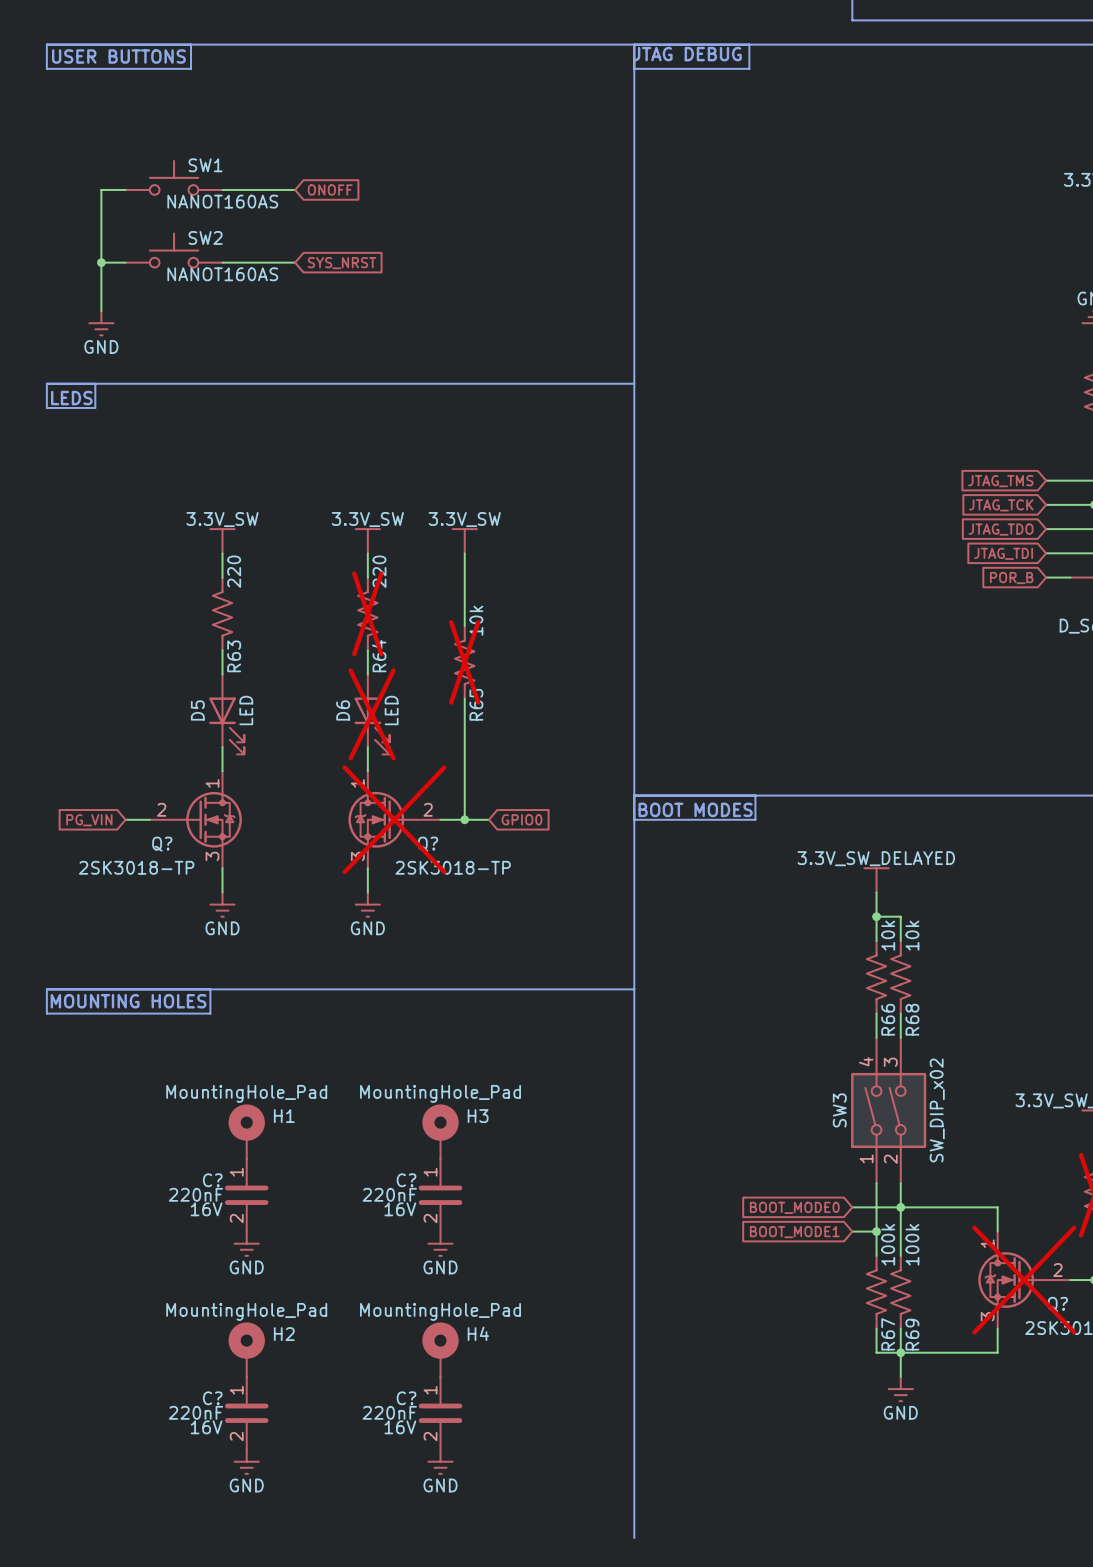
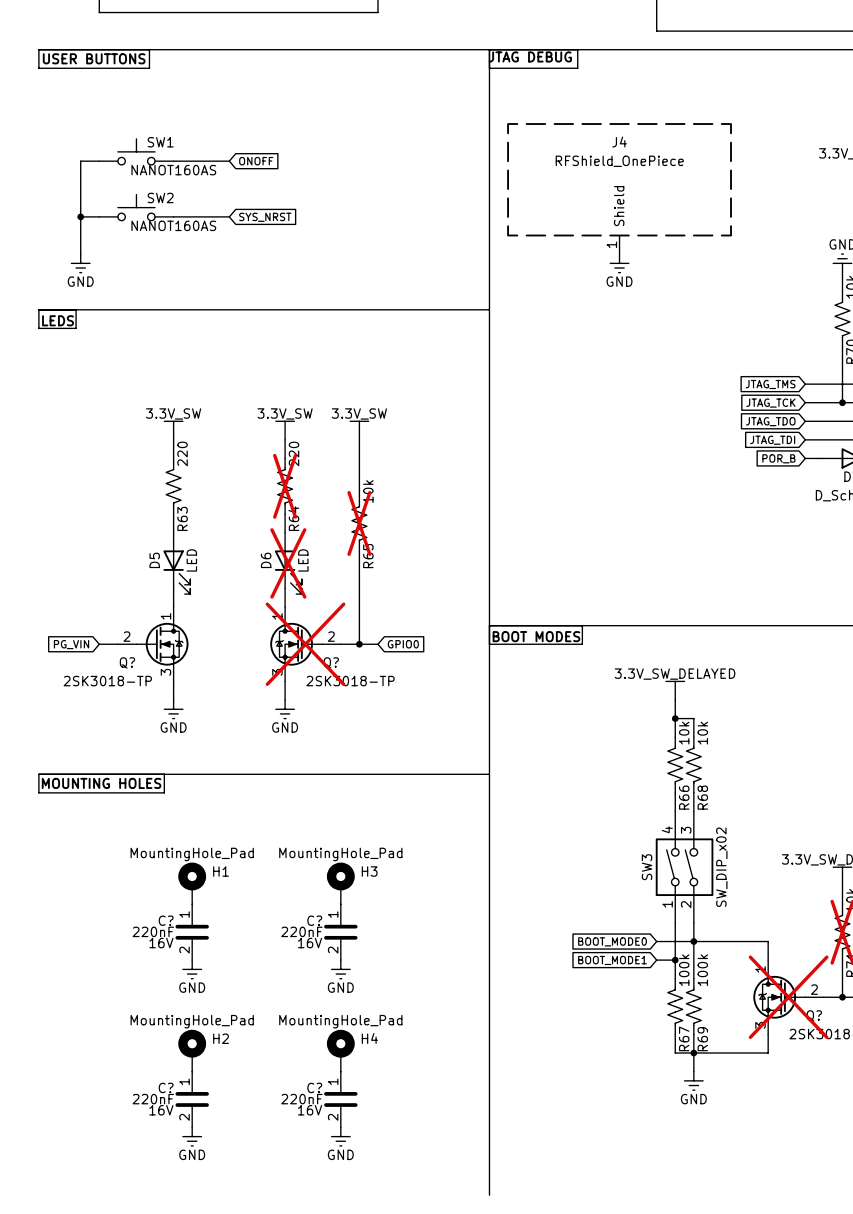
J4: none -> RFShield_OnePiece (619, 188)
power symbol: none -> GND (619, 263)

